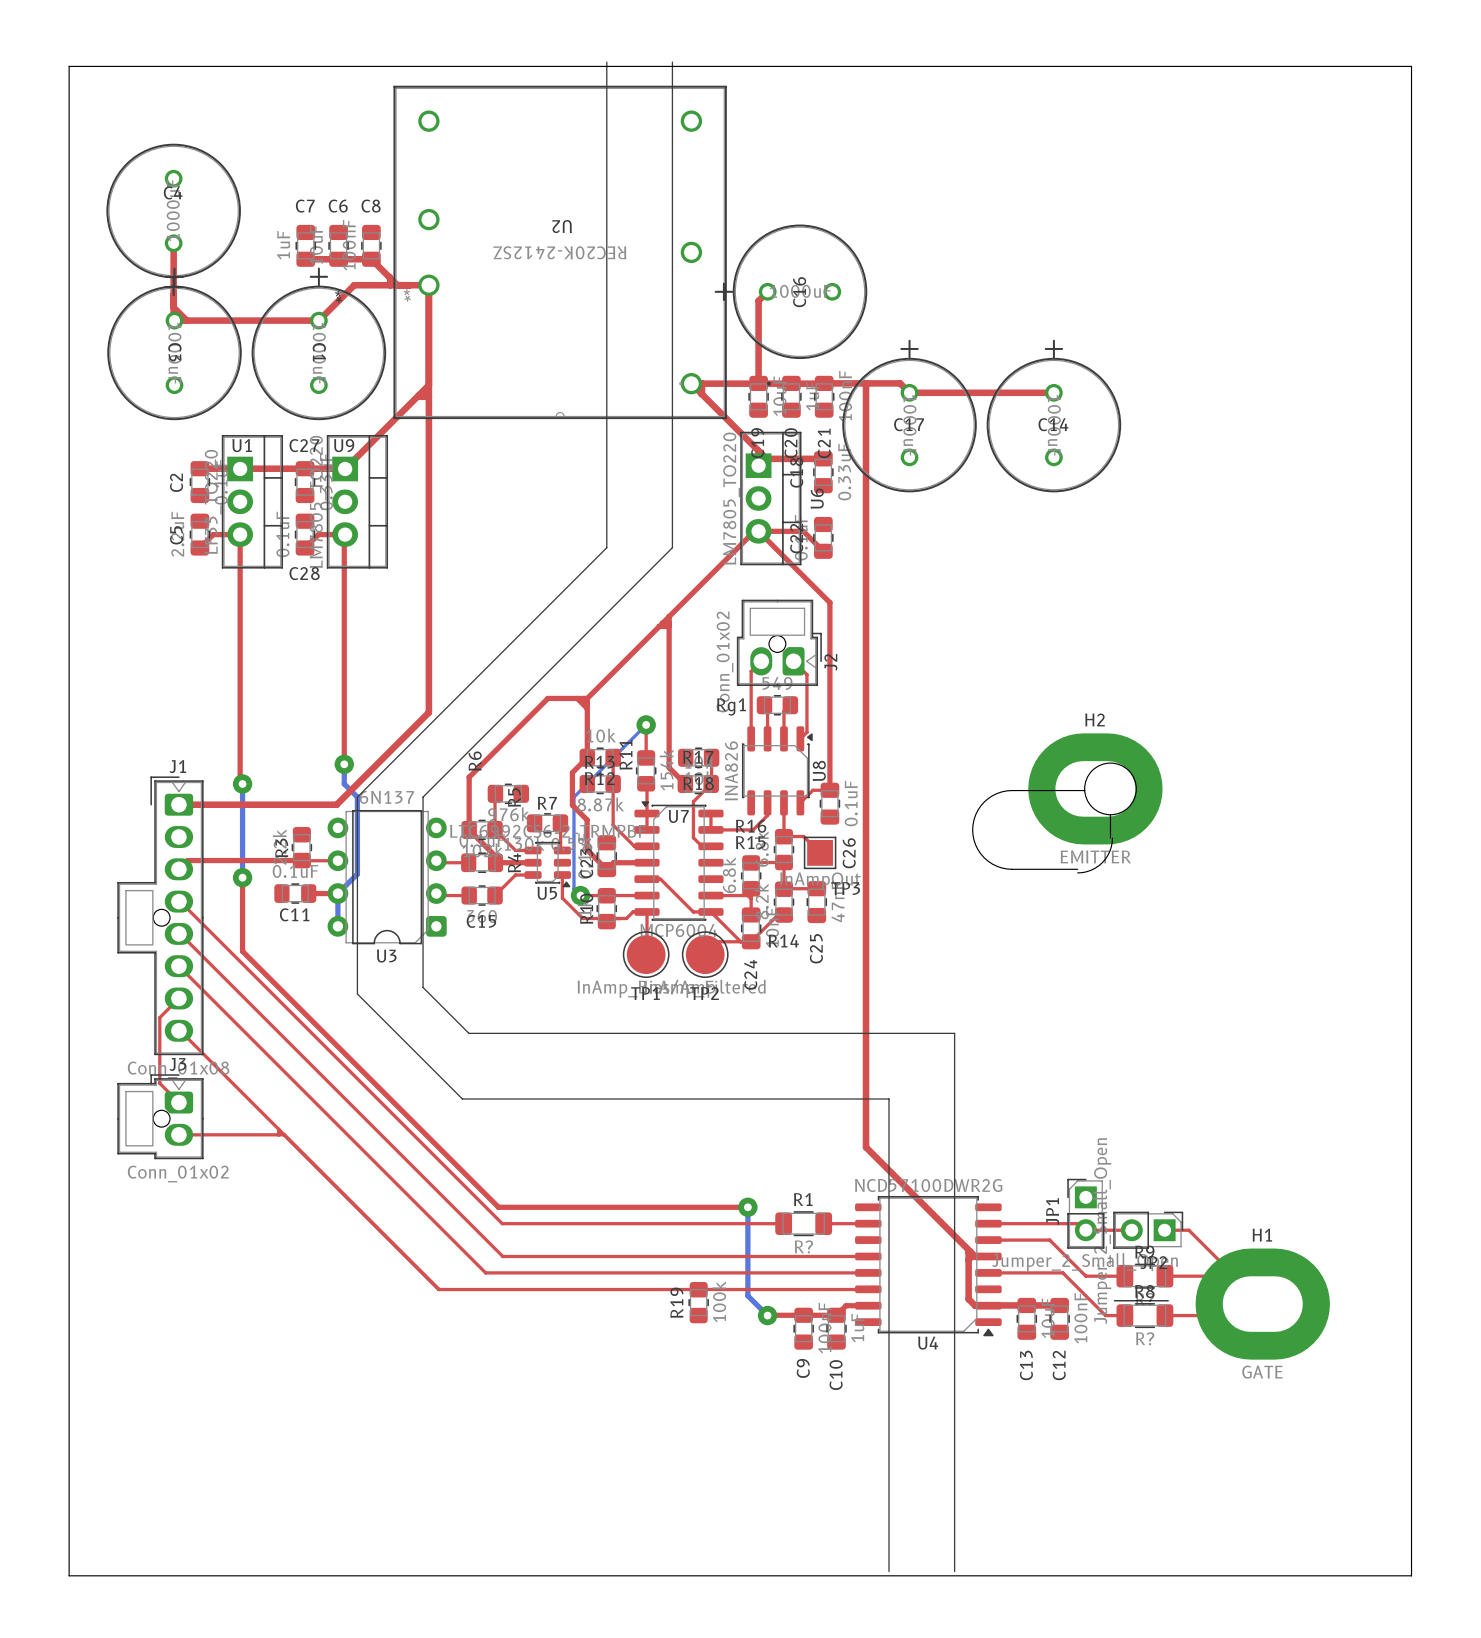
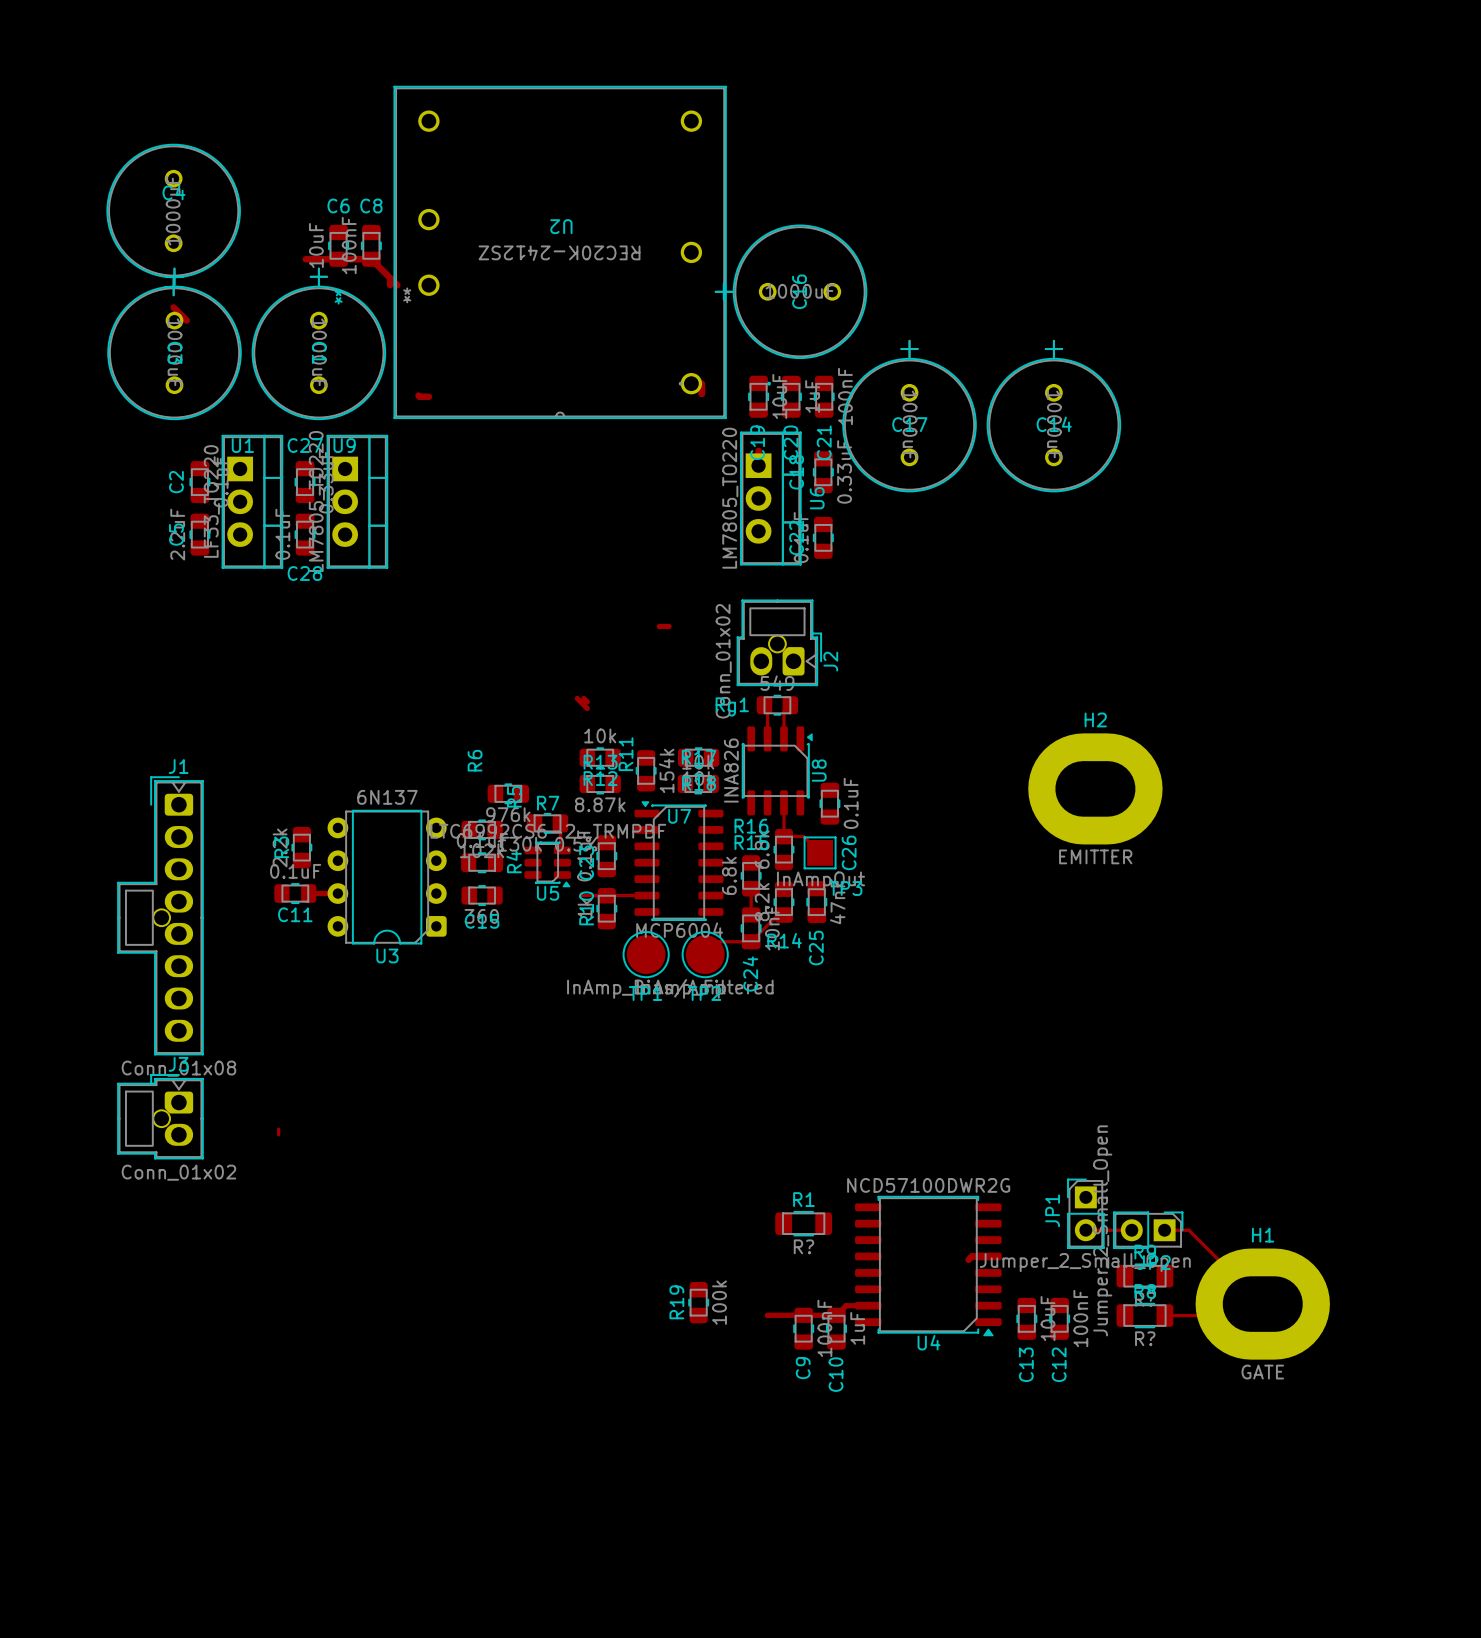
line: (606, 62) (606, 547) (357, 797) (357, 993) (462, 1099) (888, 1099) (888, 1571) -> none
line: (672, 62) (672, 547) (423, 797) (423, 987) (468, 1033) (954, 1033) (954, 1571) -> none
board edge: (69, 66) (1411, 66) (1411, 1575) (69, 1575) (69, 66) -> none
top track: (173, 243) (174, 320) (318, 320) (354, 285) (428, 285) (428, 712) (336, 804) (178, 804) -> none
C7: 1uF (305, 245) -> none
top track: (767, 291) (758, 300) (758, 383) -> none
top track: (866, 383) (866, 1147) (975, 1256) -> none
top track: (428, 385) (345, 468) (199, 468) -> none
top track: (1053, 392) (909, 392) (900, 383) (691, 383) (766, 458) (823, 458) -> none
top track: (758, 531) (829, 602) (829, 790) (812, 790) (800, 802) -> none
top track: (199, 548) (213, 534) (240, 534) (240, 781) (242, 783) -> none
top track: (305, 548) (318, 534) (345, 534) (344, 764) -> none
top track: (823, 551) (803, 531) (754, 531) (587, 698) -> none
top track: (669, 616) (669, 767) (685, 783) -> none
top track: (761, 661) (751, 671) (751, 738) -> none
top track: (793, 661) (806, 674) (806, 732) (800, 738) -> none
top track: (587, 698) (587, 757) (572, 772) (572, 805) (587, 819) (587, 849) (606, 869) (613, 862) (647, 862) -> none
top track: (587, 698) (547, 698) (469, 777) (469, 829) (495, 856) (495, 862) (533, 862) -> none
top track: (646, 724) (646, 757) -> none
bottom track: (646, 724) (573, 797) (573, 888) (580, 895) (580, 889) -> none
via: (646, 724) -> none
top track: (613, 757) (613, 825) (634, 846) (647, 846) -> none
top track: (711, 757) (711, 783) (693, 801) (693, 837) (701, 846) (710, 846) -> none
round board edge: [1084, 762, 1137, 816] -> none
bottom track: (344, 764) (344, 783) (357, 797) (357, 874) (337, 893) (337, 926) -> none
via: (344, 764) -> none
bottom track: (242, 783) (242, 877) -> none
via: (242, 783) -> none
top track: (647, 784) (647, 829) -> none
board edge: (1084, 790) (1001, 791) (992, 795) (980, 805) (972, 824) (972, 835) (977, 849) (988, 861) (996, 866) (1012, 869) (1077, 869) -> none
top track: (495, 797) (495, 829) (515, 850) (533, 850) -> none
top track: (767, 802) (767, 815) (753, 829) (710, 829) (710, 813) -> none
board edge: (1110, 814) (1110, 838) -> none
board edge: (1112, 838) (1109, 851) (1102, 862) (1090, 870) (1077, 872) -> none
top track: (301, 860) (187, 860) (178, 869) -> none
top track: (302, 860) (337, 860) -> none
top track: (438, 862) (468, 862) -> none
top track: (751, 862) (783, 862) (783, 889) (816, 888) -> none
top track: (533, 875) (515, 875) (495, 895) -> none
top track: (562, 875) (562, 898) (582, 918) (626, 918) (633, 911) (647, 911) (646, 954) (646, 944) -> none
top track: (242, 877) (242, 951) (498, 1207) (747, 1207) -> none
via: (242, 877) -> none
top track: (647, 879) (660, 879) (693, 911) (710, 911) (740, 941) -> none
top track: (438, 895) (469, 895) -> none
via: (580, 895) -> none
top track: (710, 895) (747, 895) (751, 898) -> none
top track: (180, 901) (502, 1223) (783, 1223) -> none
top track: (180, 933) (502, 1256) (868, 1256) -> none
top track: (178, 966) (485, 1272) (868, 1272) -> none
top track: (178, 998) (159, 1017) (159, 1083) (178, 1102) -> none
top track: (180, 1030) (438, 1289) (868, 1289) -> none
top track: (178, 1134) (284, 1134) -> none
bottom track: (747, 1207) (747, 1295) (767, 1315) -> none
via: (747, 1207) -> none
top track: (823, 1223) (868, 1223) -> none
top track: (988, 1223) (1079, 1223) (1085, 1230) (1089, 1230) -> none
top track: (988, 1240) (1049, 1240) (1085, 1276) (1124, 1276) -> none
top track: (969, 1251) (968, 1299) (975, 1305) (1059, 1305) -> none
top track: (988, 1272) (1062, 1272) (1105, 1315) (1124, 1315) -> none
top track: (1164, 1276) (1234, 1276) -> none
board edge: (1114, 1300) (1168, 1300) -> none
via: (767, 1315) -> none

